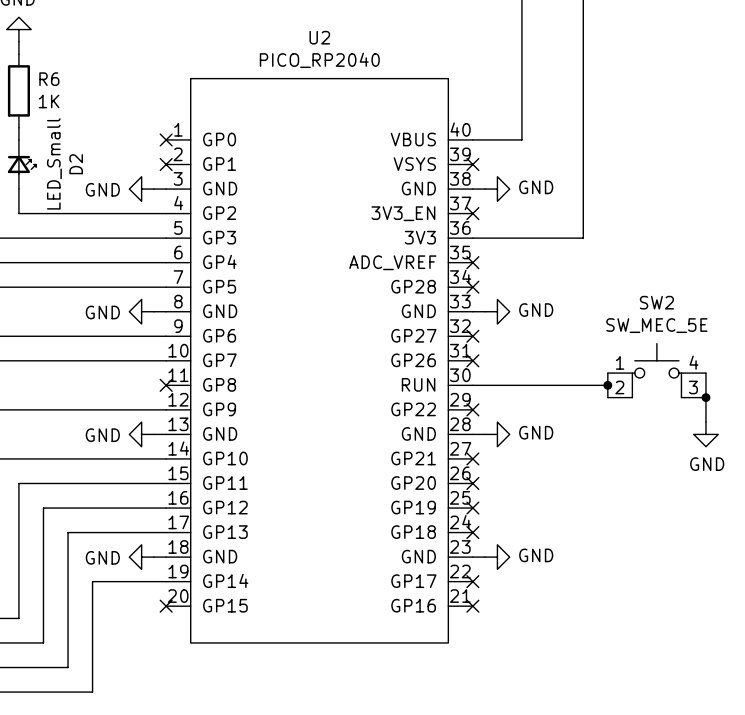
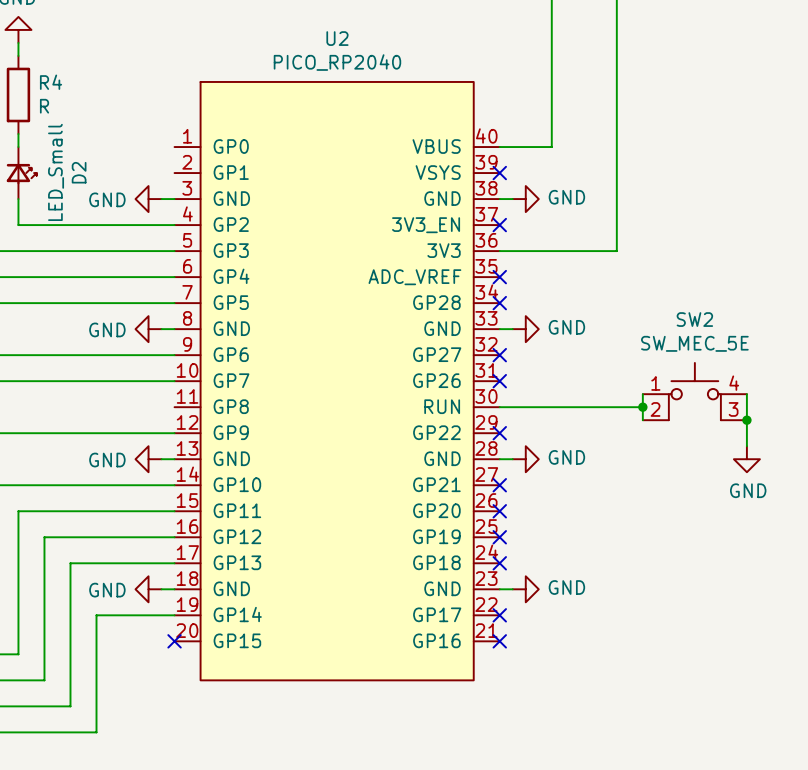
R6 name: R6 (49, 79) -> R4 (51, 82)
R6 value: 1K (49, 101) -> R (44, 106)
no-connect mark: (166, 139) -> none
no-connect mark: (166, 164) -> none
no-connect mark: (166, 385) -> none

